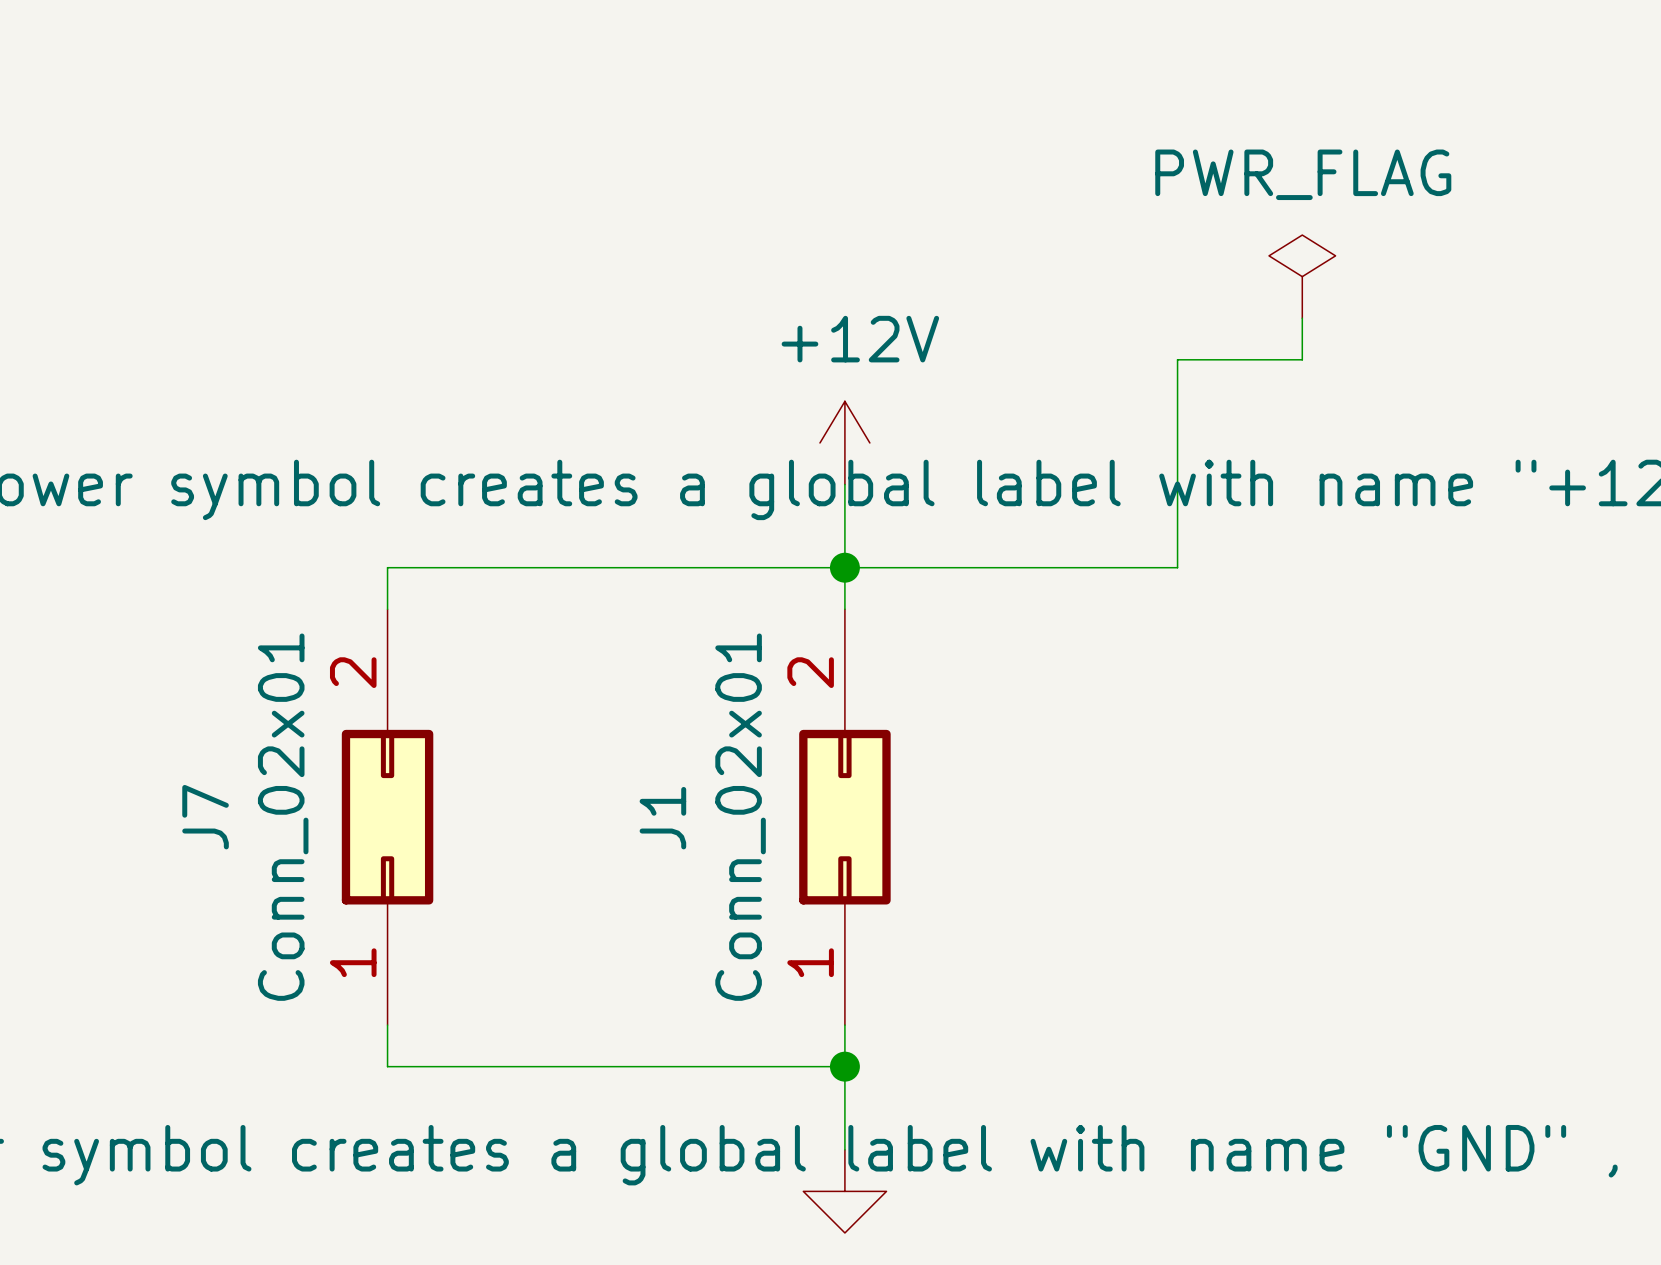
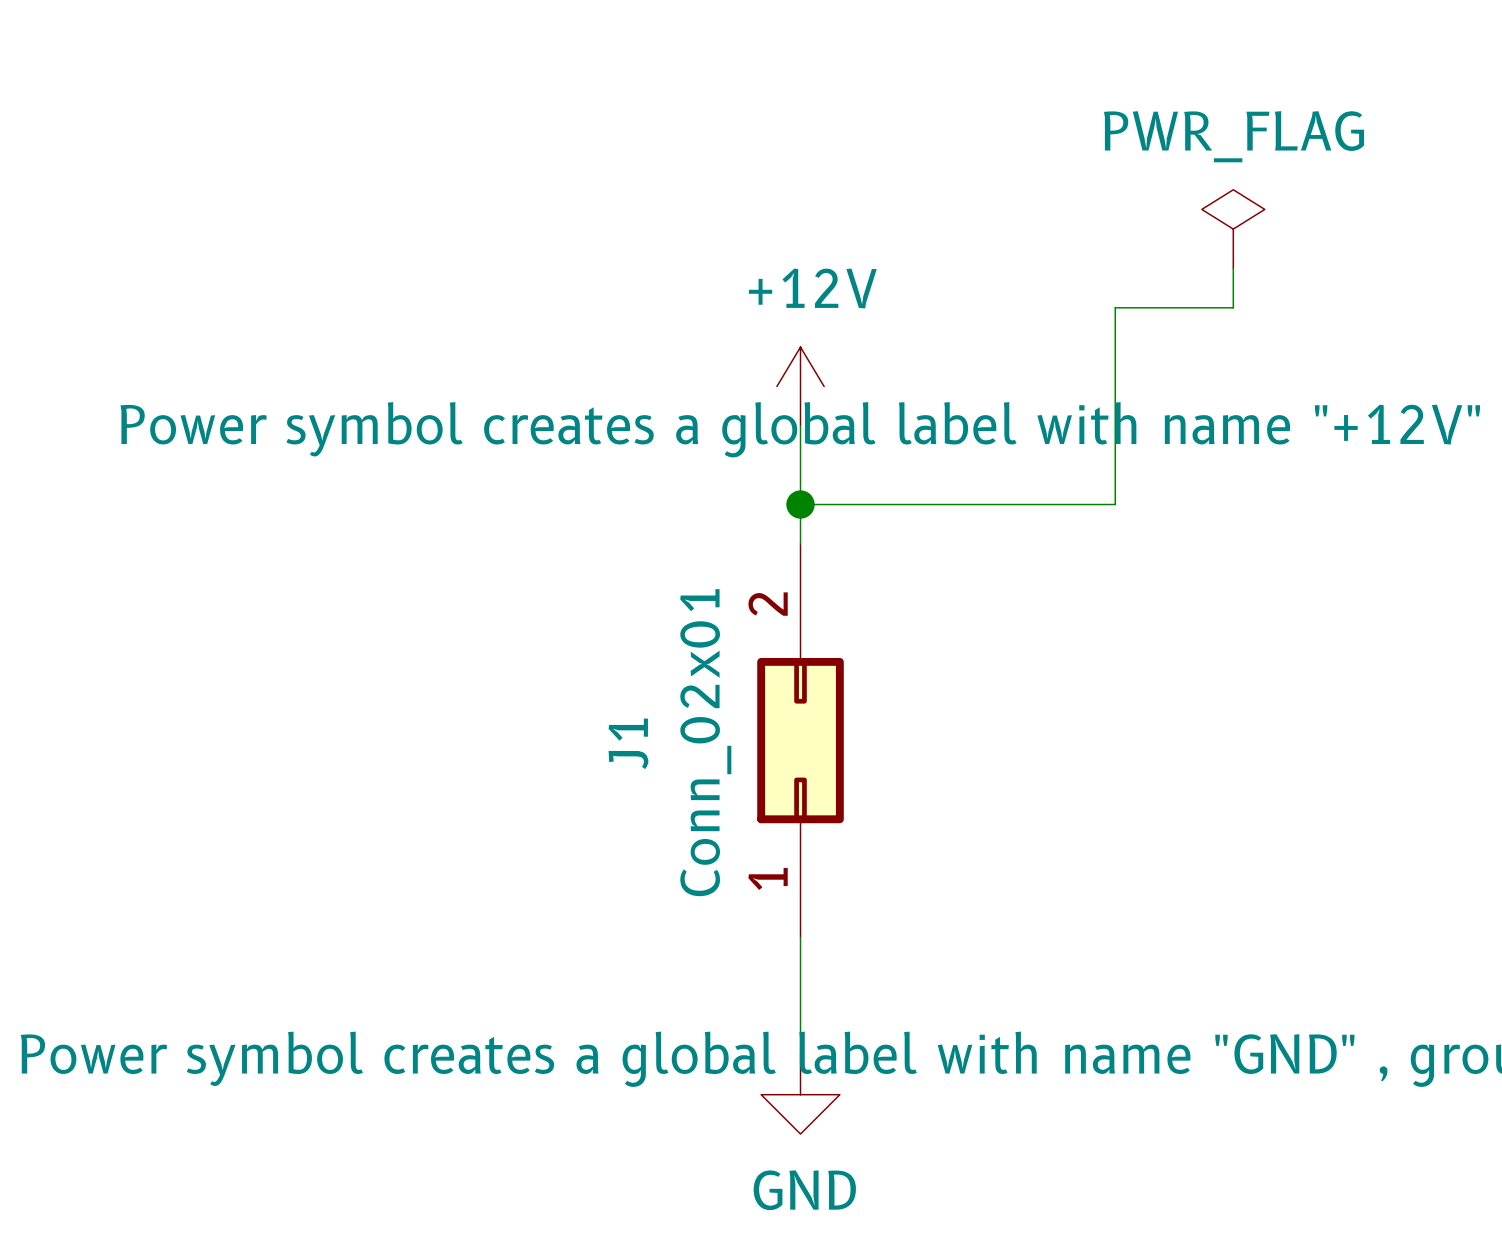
wire: (844, 567) (387, 567) (387, 609) -> none
J7: Conn_02x01 (387, 817) -> none
wire: (387, 1025) (387, 1066) (844, 1066) -> none
junction: (844, 1066) -> none

